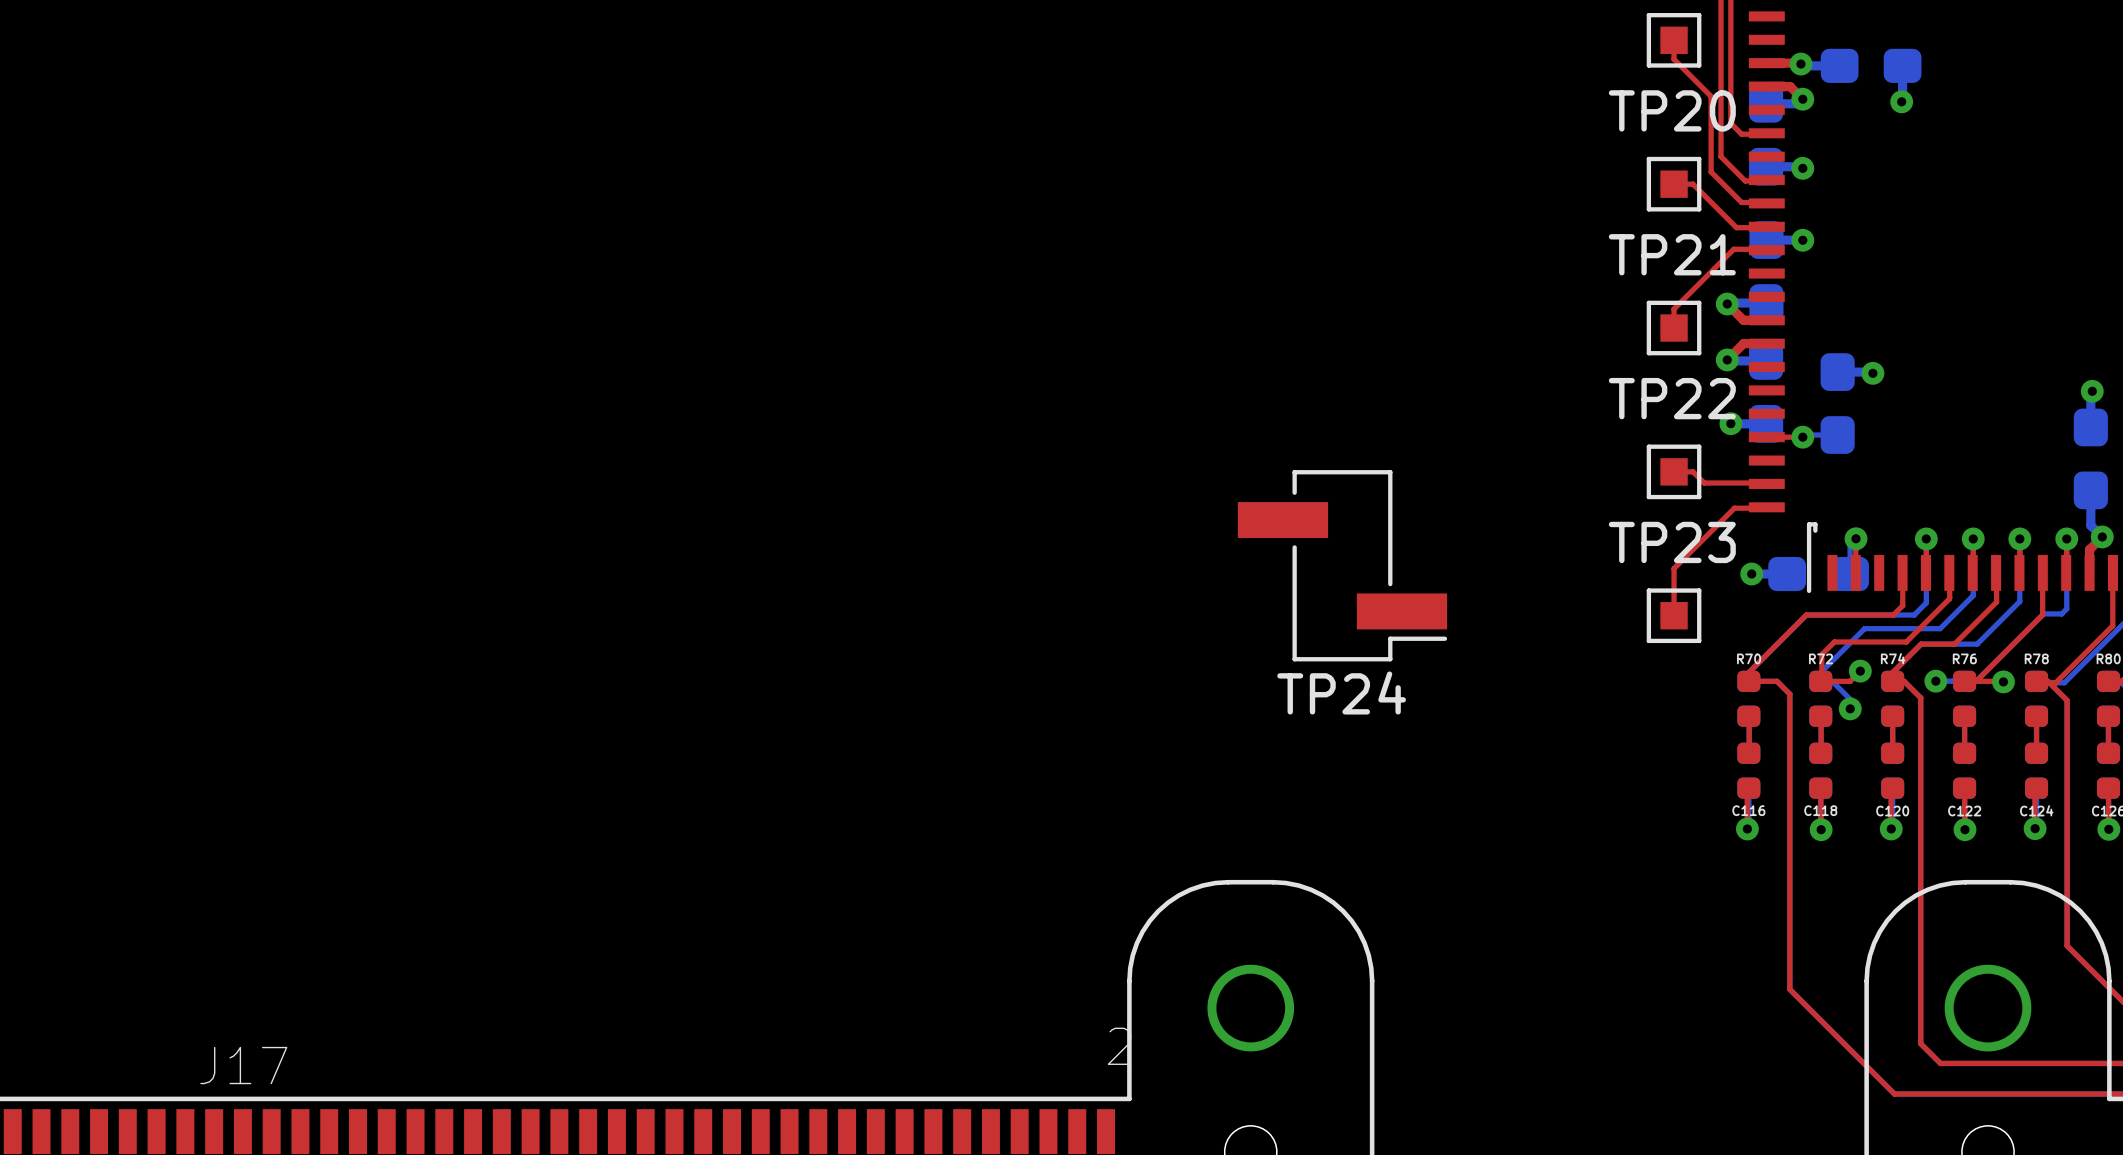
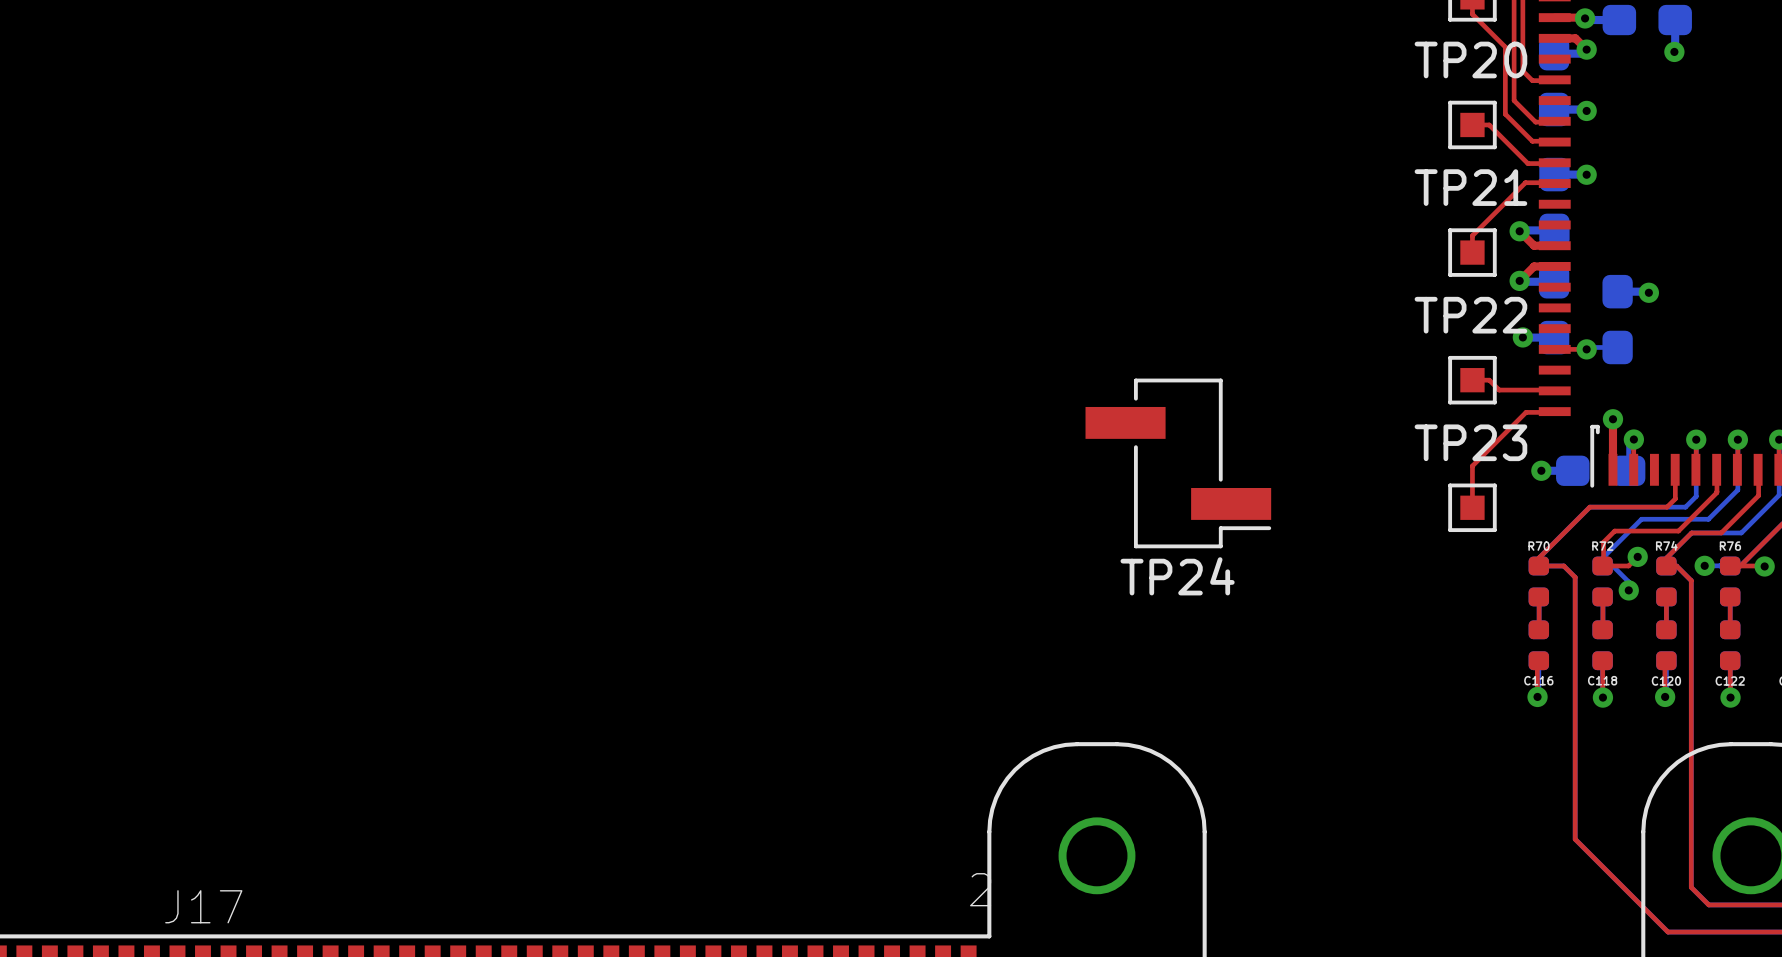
top track: none -> (1612, 419) (1612, 469)
via: none -> (1612, 419)

